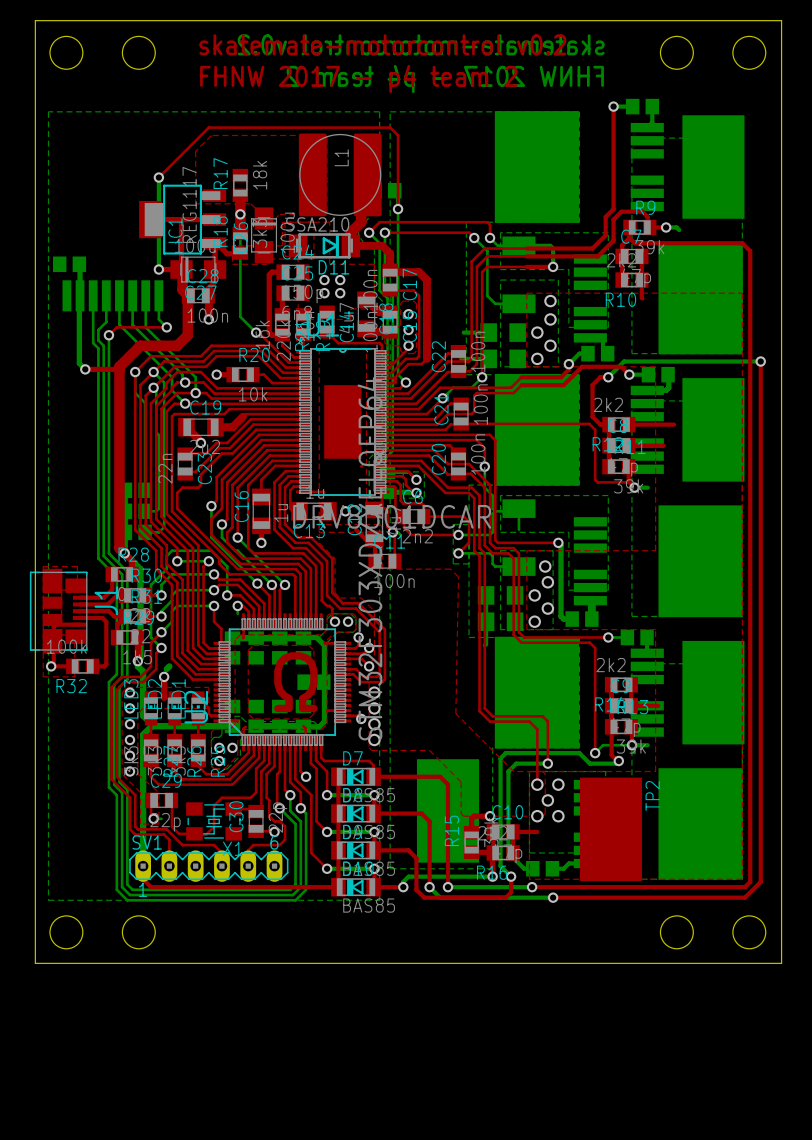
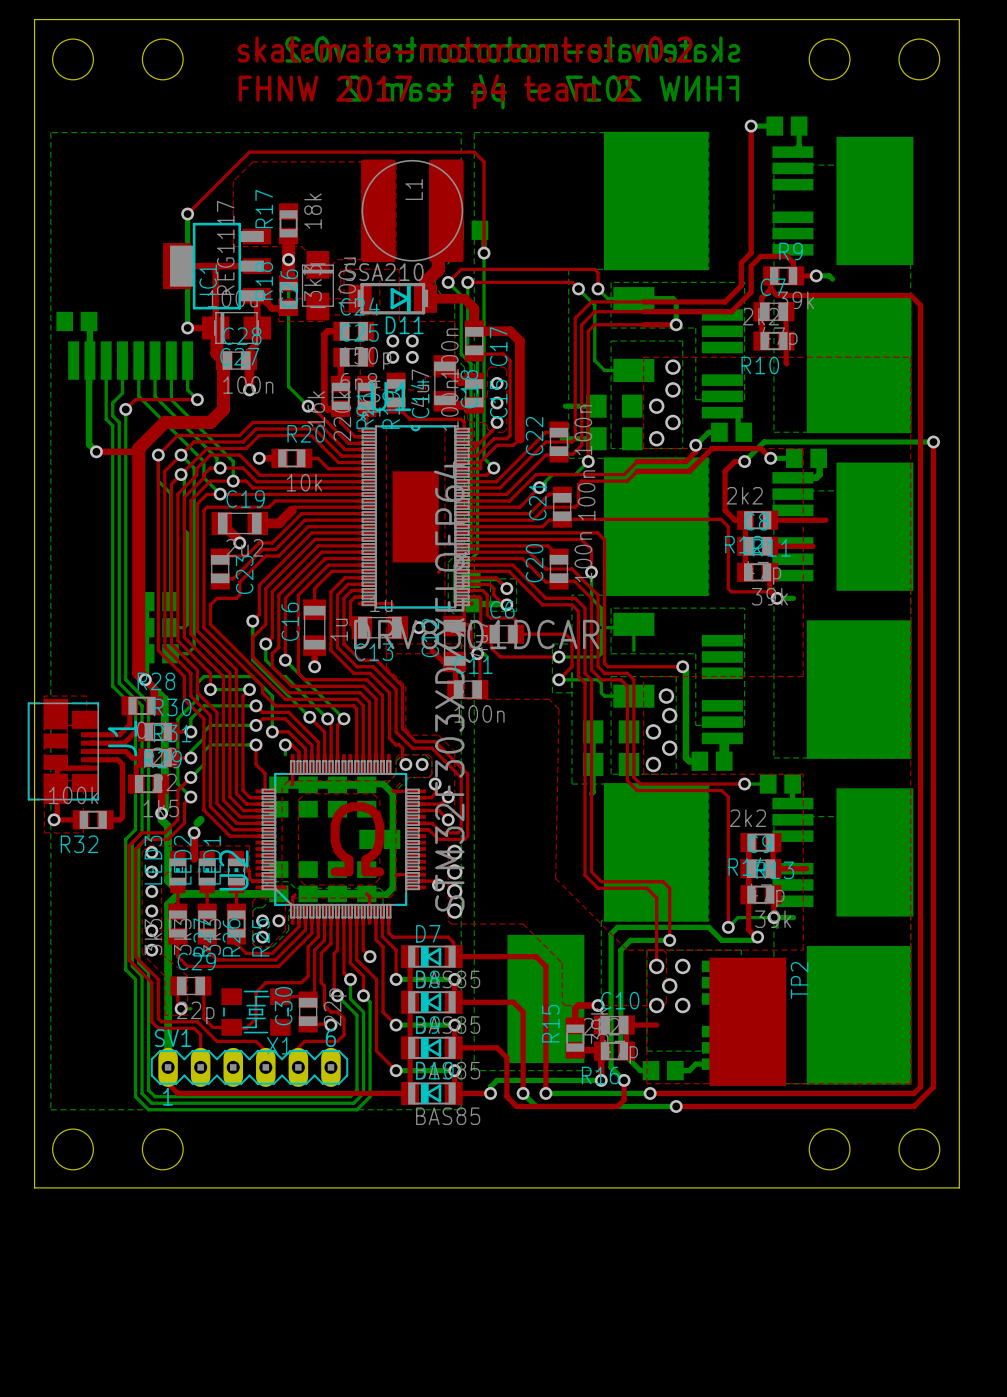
C23 value: 22n (165, 468) -> none
C6 value: 2n2 (417, 536) -> none

